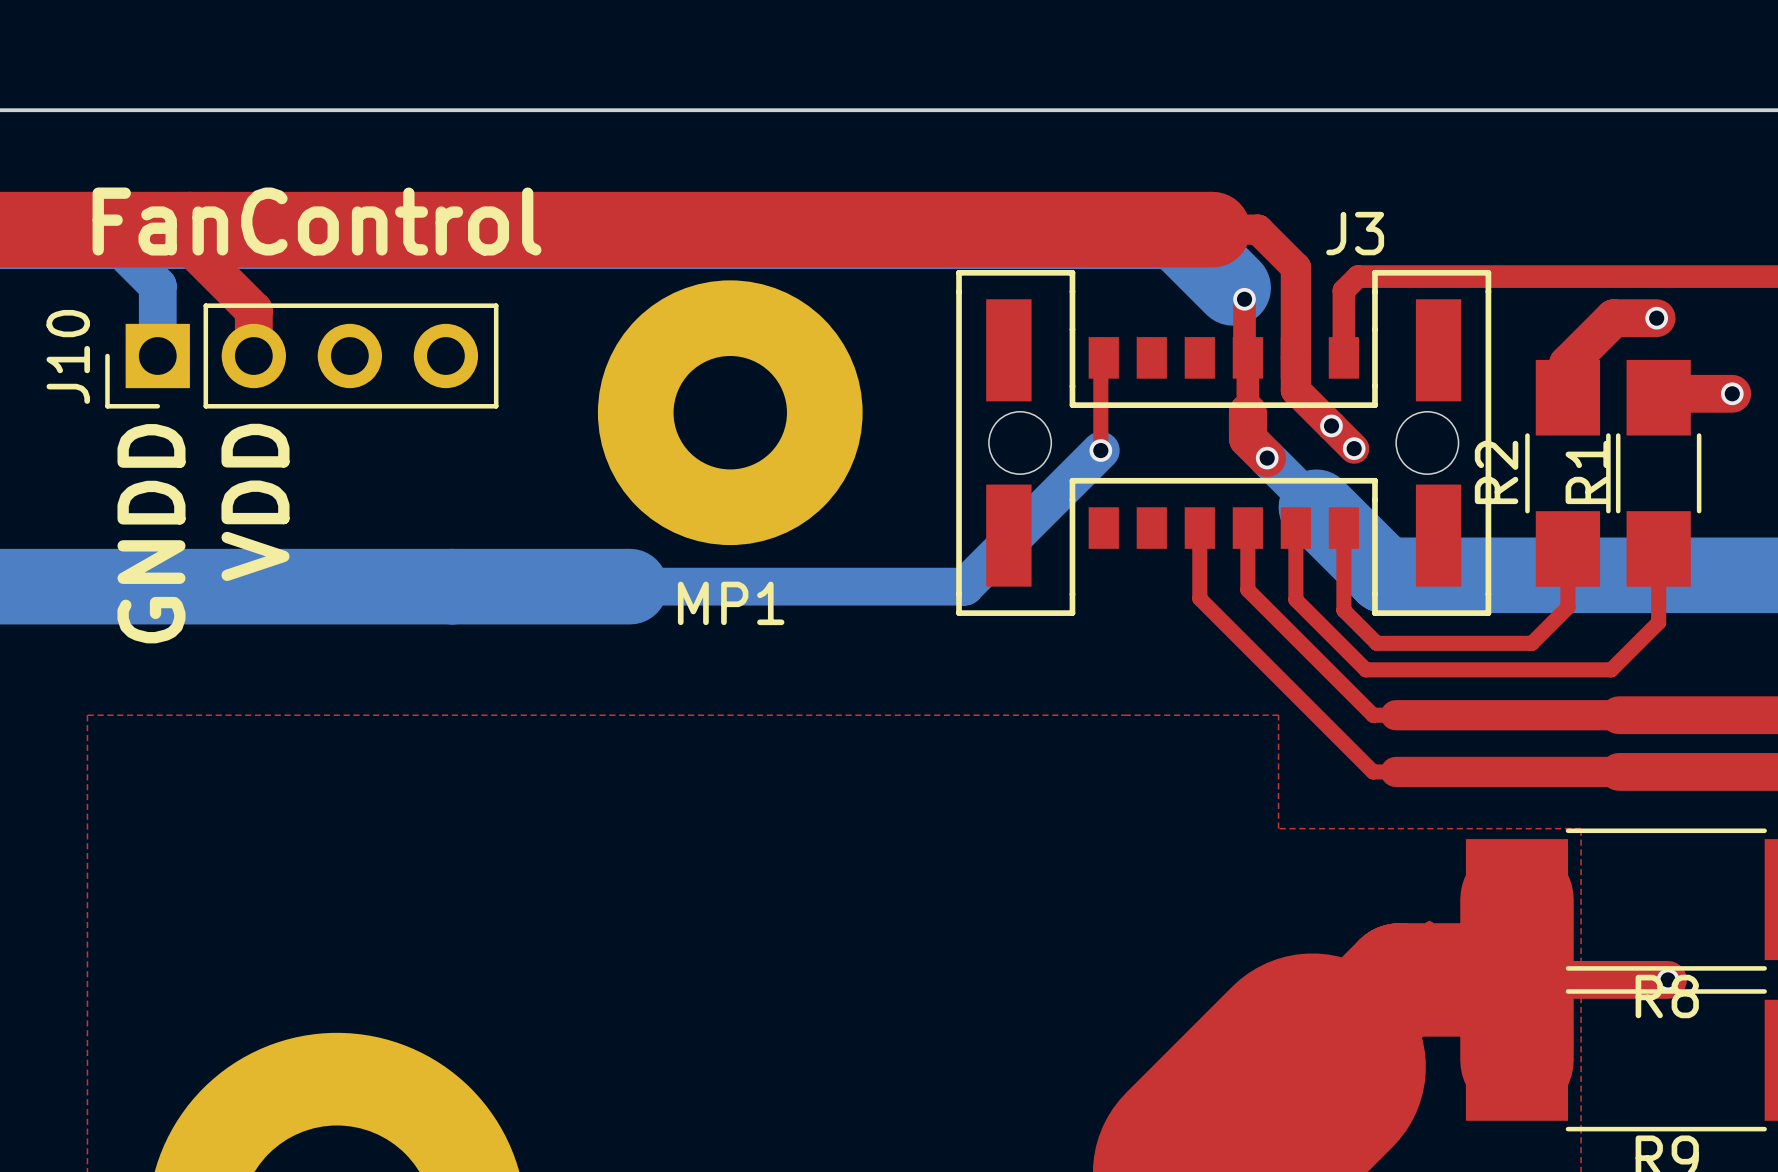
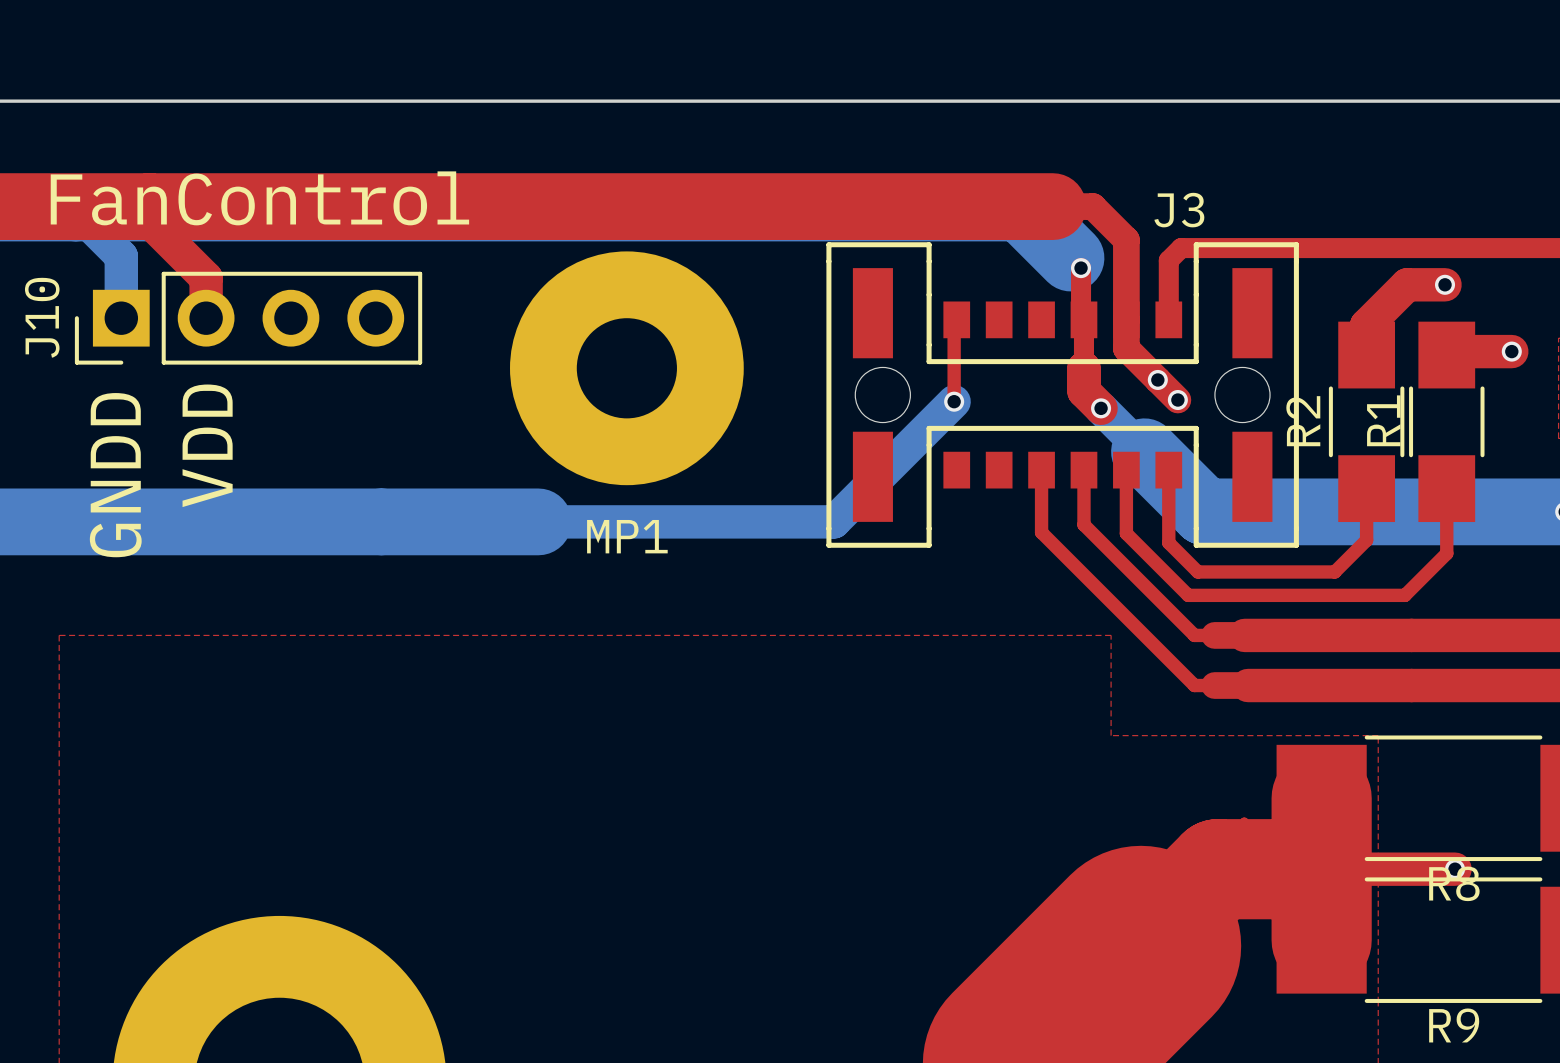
top track width: thin (1429, 715) (1618, 715) -> thick (1244, 635) (1411, 635)
top track width: thin (1433, 771) (1618, 771) -> thick (1248, 685) (1411, 685)

